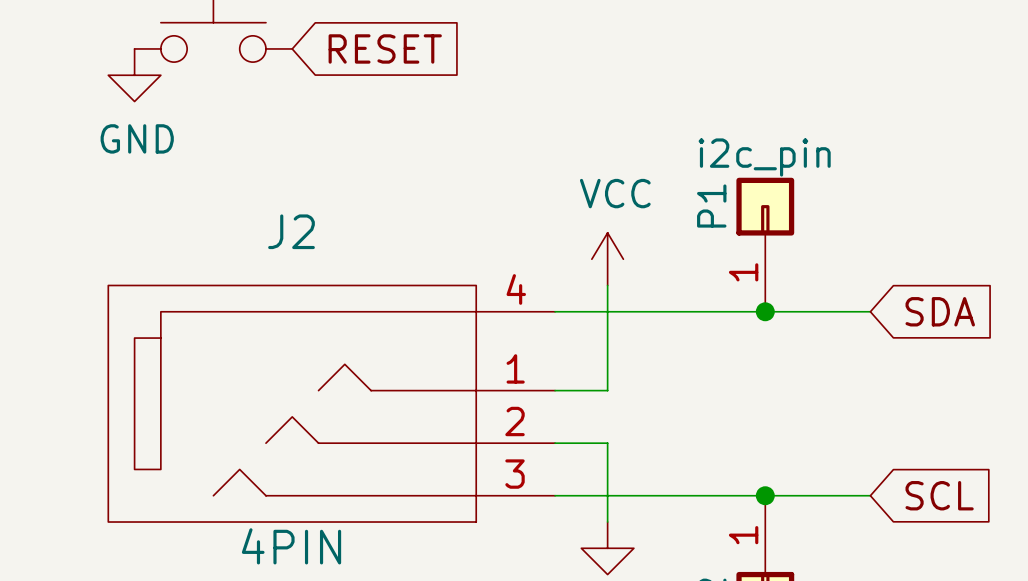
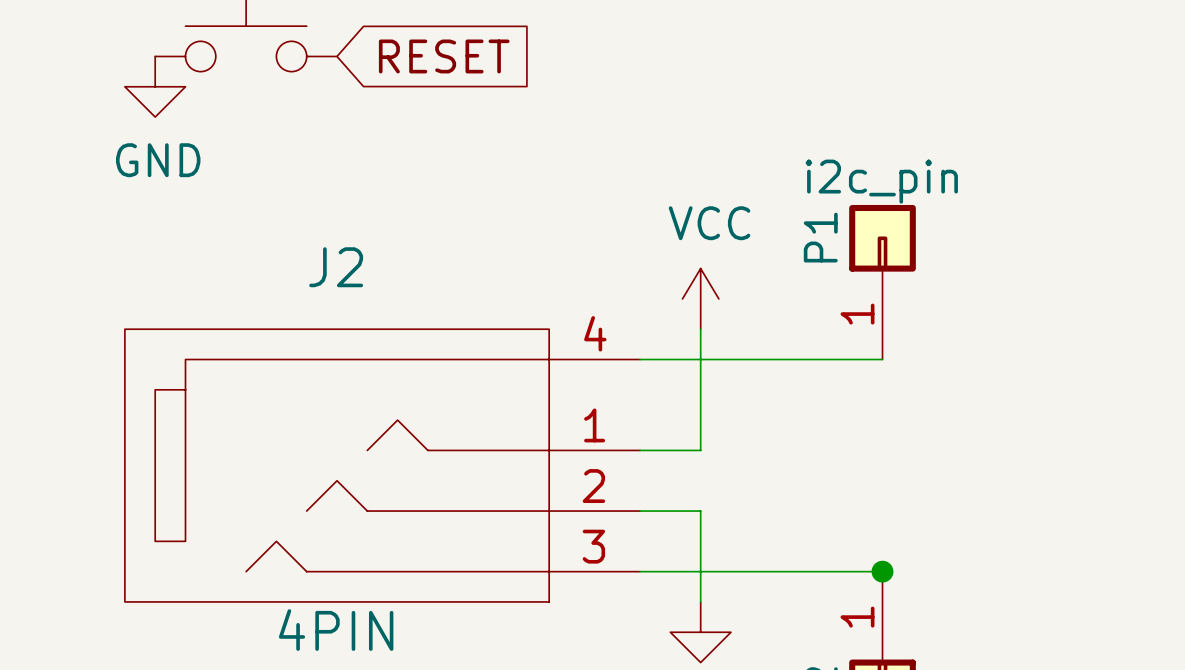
wire: (765, 311) (870, 311) -> none
junction: (765, 311) -> none
global label: SDA (940, 311) -> none
wire: (765, 495) (870, 495) -> none
global label: SCL (939, 495) -> none

